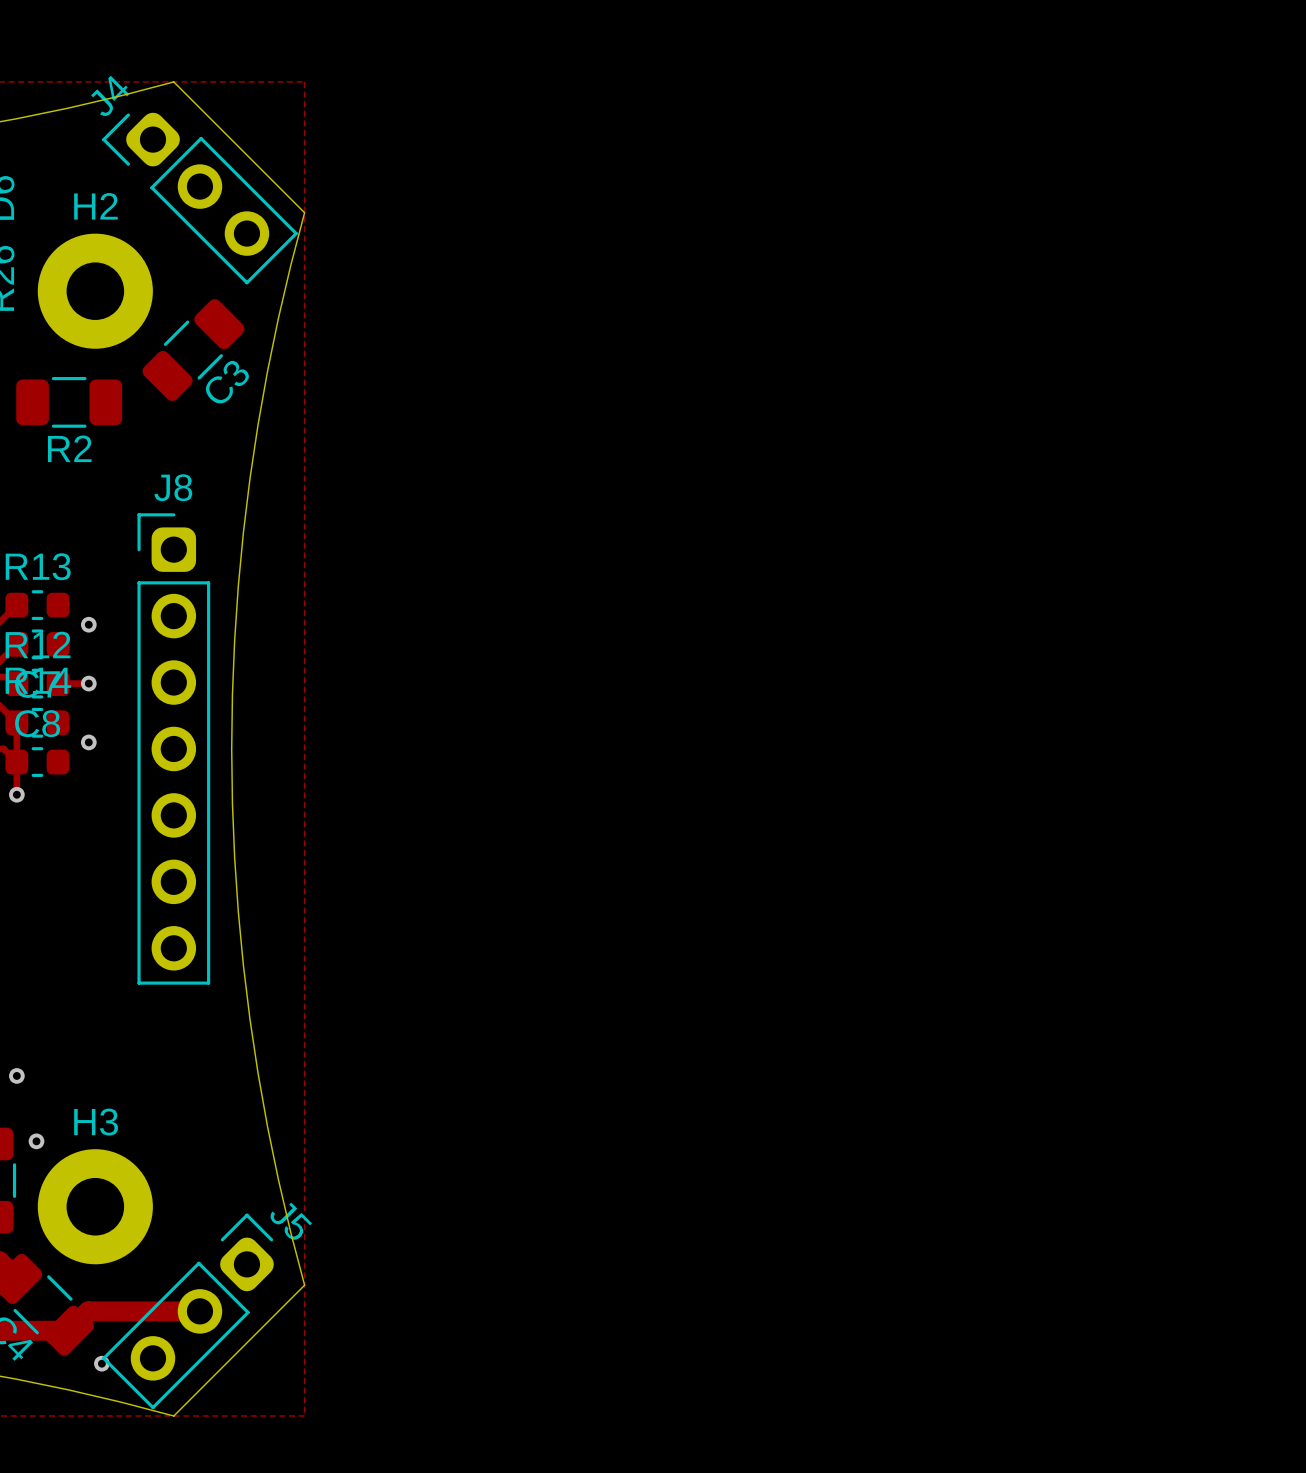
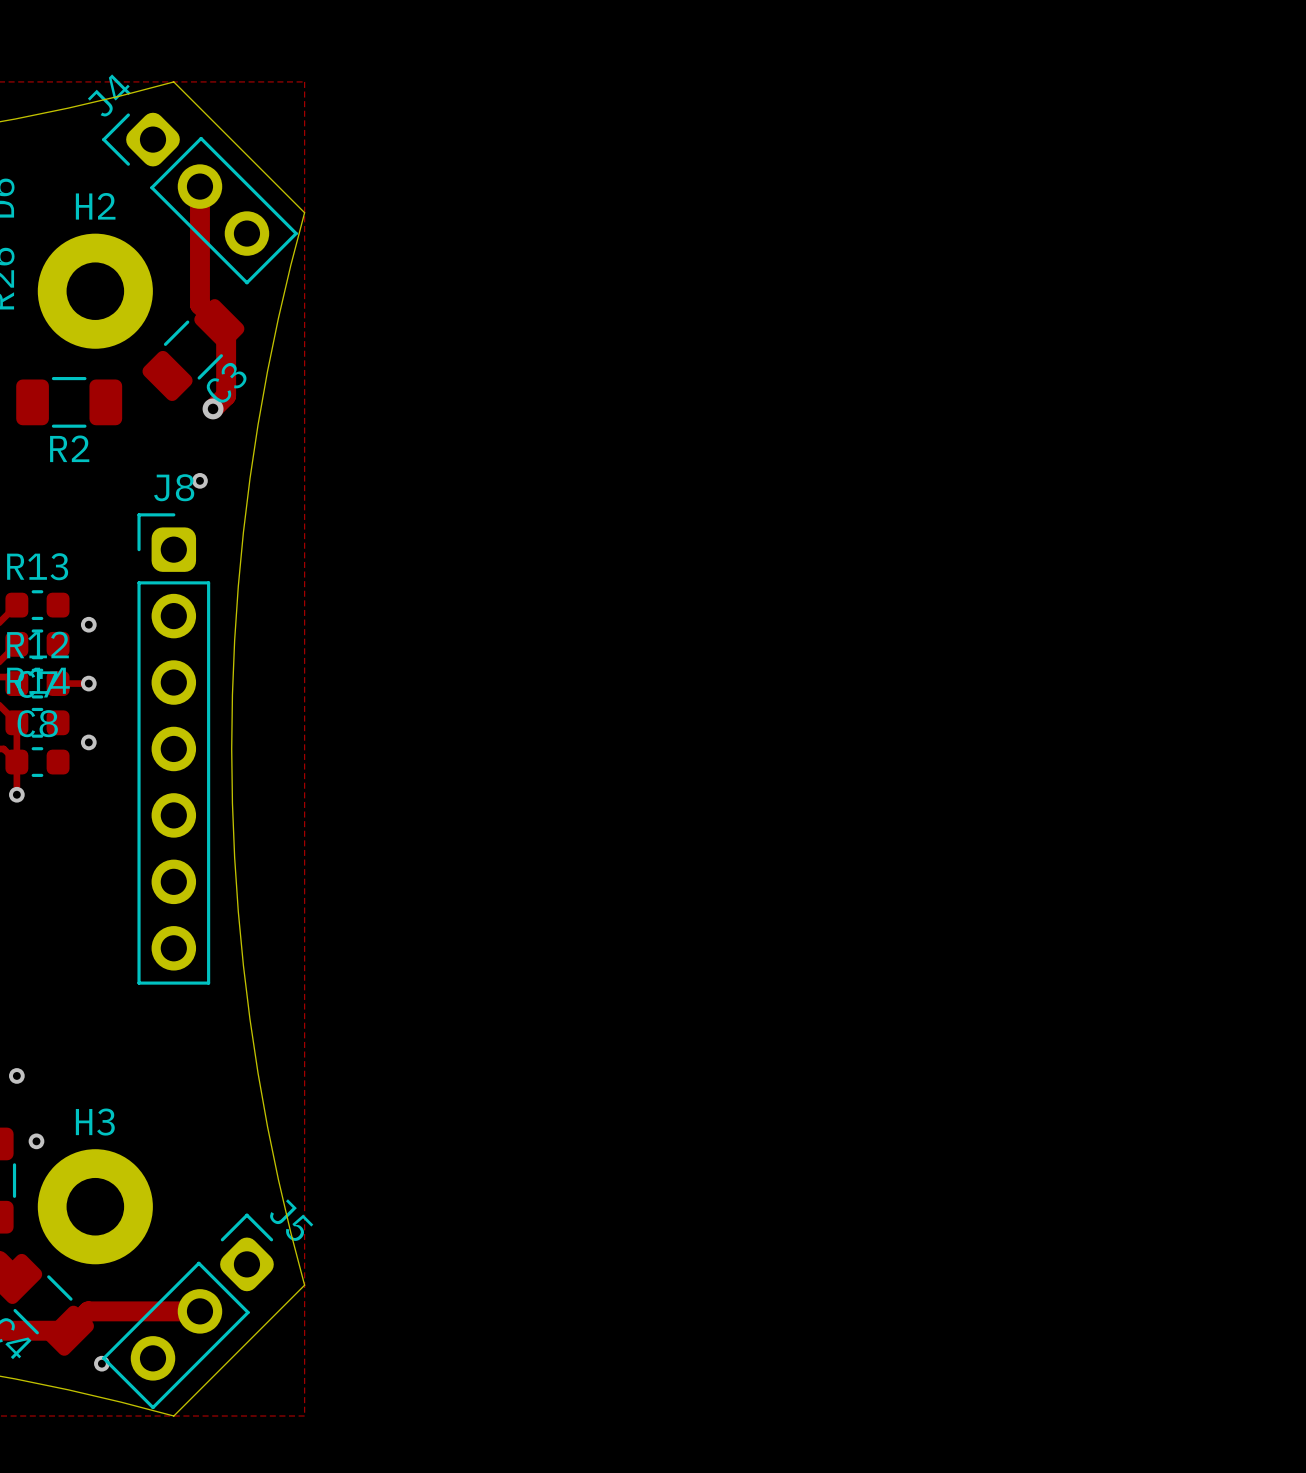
track: none -> (199, 186) (199, 304) (226, 330) (226, 395) (213, 408)
via: none -> (213, 408)
via: none -> (199, 480)

